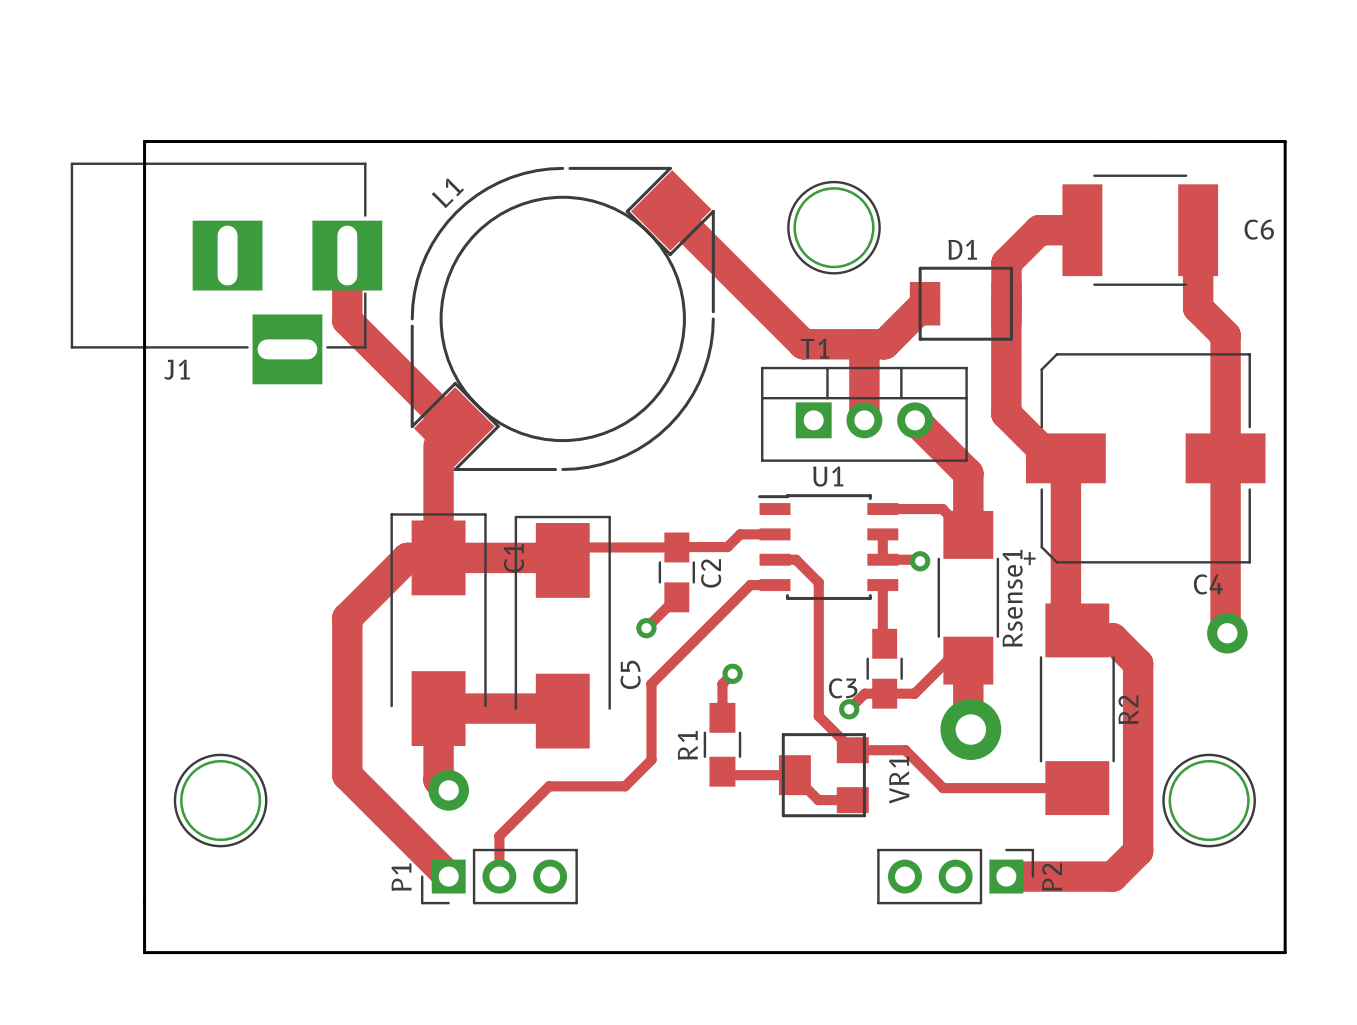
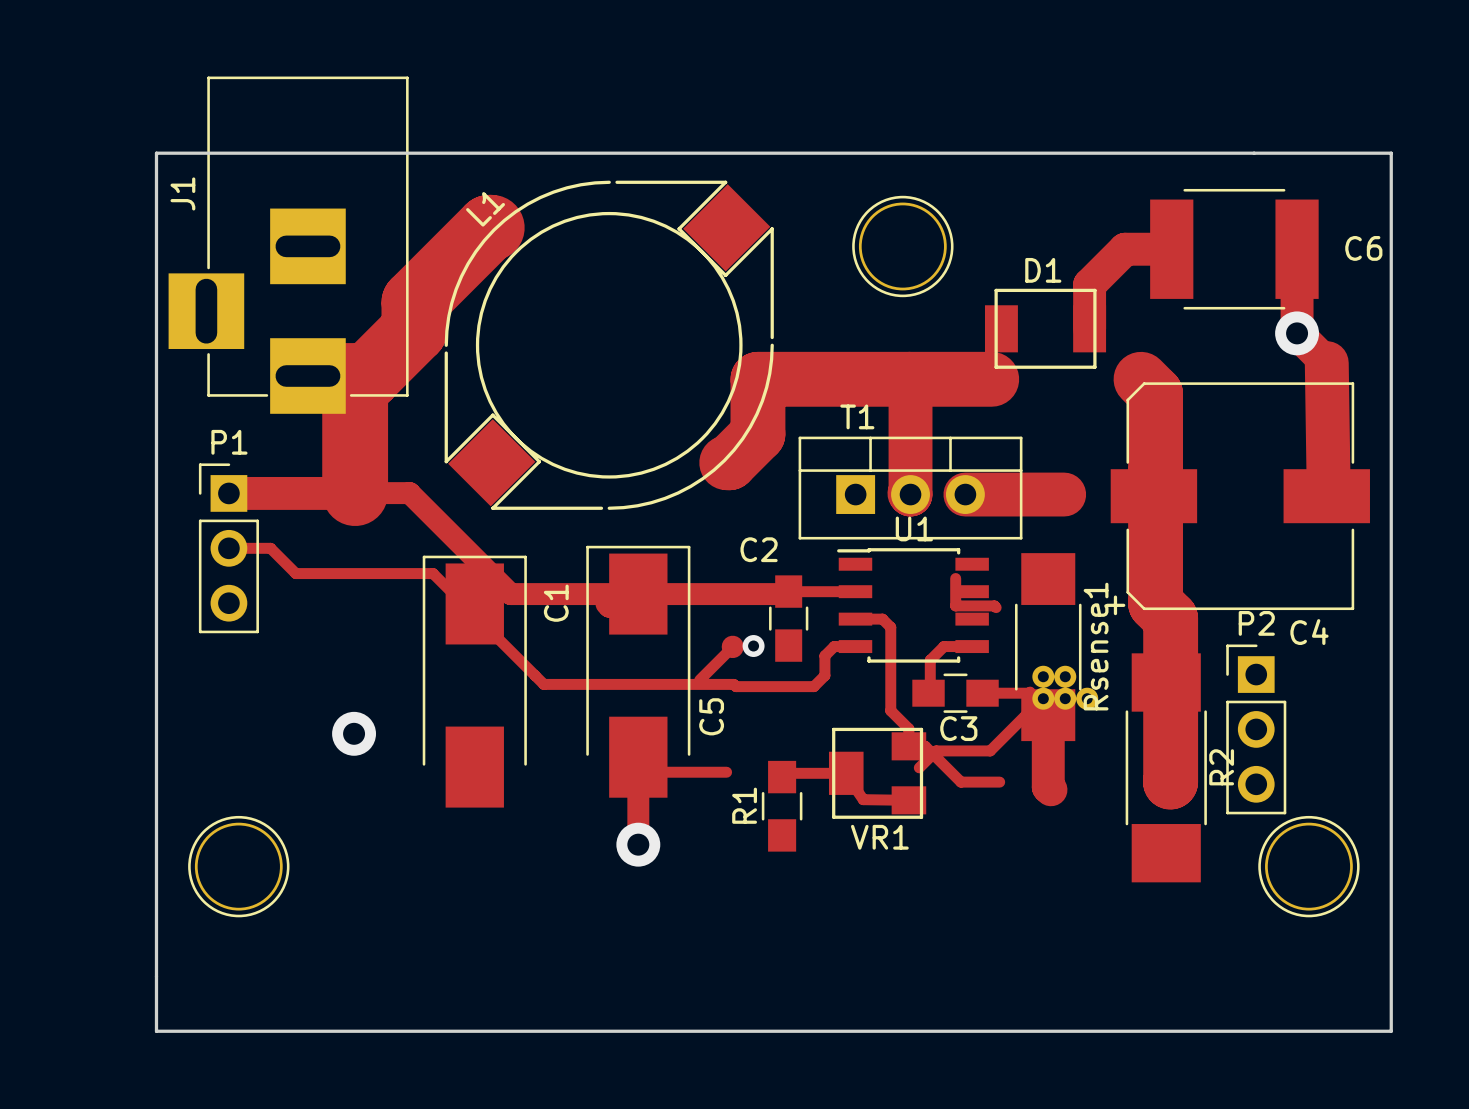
track: none -> (491, 227) (489, 227) (414, 302) (414, 329) (355, 389) (355, 493)
track: (671, 210) (803, 344) (884, 344) (925, 303) -> none
track: (347, 255) (347, 320) (454, 427) (454, 430) (438, 445) (438, 557) -> none
J1 rotation: 0° (226, 273) -> 90° clockwise (288, 245)
track: (1006, 306) (1006, 413) (1050, 458) (1065, 458) (1065, 619) (1085, 638) (1112, 638) (1138, 663) (1138, 851) (1112, 876) (1006, 876) -> none
via: none -> (1297, 333)
track: (1225, 335) (1225, 631) (1227, 633) -> (1326, 363) (1328, 472)
track: (864, 344) (864, 420) -> none
track: none -> (991, 379) (757, 379) (757, 434) (729, 462) (726, 462)
track: none -> (1141, 379) (1155, 393) (1155, 603) (1170, 618) (1170, 781)
track: none -> (909, 380) (910, 379) (910, 494) (909, 493)
T1 position: (864, 414) -> (910, 488)
track: (915, 420) (968, 473) (968, 534) (942, 509) (882, 509) -> none
track: none -> (355, 493) (409, 493) (510, 594) (786, 594) (788, 591)
track: none -> (355, 493) (228, 493)
track: none -> (965, 494) (1064, 494)
track: none -> (228, 548) (270, 548) (295, 573) (433, 573) (543, 684) (733, 684) (736, 686) (813, 686) (824, 675) (824, 655) (834, 646) (855, 646)
track: (775, 534) (740, 534) (727, 547) (575, 547) -> none
track: none -> (788, 591) (855, 591)
U1 position: (828, 547) -> (913, 605)
track: (560, 557) (407, 557) (347, 618) (347, 775) (448, 876) -> none
track: (775, 559) (795, 559) (818, 582) (818, 716) (852, 750) (905, 750) (943, 788) (1077, 788) -> none
via: (920, 561) -> none
track: none -> (855, 619) (882, 619) (890, 627) (890, 710) (908, 728) (908, 746) (925, 746) (961, 782) (999, 782)
C2 position: (676, 572) -> (788, 618)
C2 name rotation: 0° (711, 573) -> 90° clockwise (759, 549)
C2 name position: C2 (711, 573) -> C2 (759, 549)
track: (775, 585) (750, 585) (651, 683) (651, 759) (625, 786) (549, 786) (499, 836) (499, 876) -> none
track: (882, 585) (882, 641) (884, 643) -> none
via: none -> (753, 646)
track: none -> (972, 646) (944, 646) (930, 660) (930, 691) (928, 693)
part: none -> (1043, 676)
part: none -> (1065, 676)
via: (646, 628) -> none
C5 position: (562, 632) -> (638, 671)
via: (1227, 633) -> none
track: none -> (1030, 692) (982, 693)
part: none -> (1043, 698)
part: none -> (1065, 698)
part: none -> (1087, 698)
C3 rotation: 0° (884, 668) -> 90° clockwise (955, 693)
track: (732, 673) (722, 683) (722, 717) -> none
via: (732, 673) -> none
via: none -> (354, 733)
C3 name position: C3 (843, 688) -> C3 (958, 728)
via: (849, 709) -> none
track: (562, 711) (560, 708) (438, 708) (438, 780) (448, 790) -> none
track: none -> (726, 772) (653, 772) (638, 757) (638, 844)
track: none -> (784, 772) (846, 773) (863, 799) (908, 800)
via: (970, 729) -> none
track: (722, 771) (725, 775) (794, 775) (818, 800) (852, 800) -> none
VR1 position: (823, 775) -> (877, 773)
VR1 name rotation: 0° (899, 779) -> 90° clockwise (879, 837)
VR1 name position: VR1 (899, 779) -> VR1 (879, 837)
via: none -> (638, 844)
via: (448, 790) -> none
P1 rotation: 0° (499, 876) -> 90° clockwise (228, 548)
P1 position: (499, 876) -> (228, 548)
P2 rotation: 0° (955, 876) -> 90° counterclockwise (1256, 729)
P2 position: (955, 876) -> (1256, 729)

